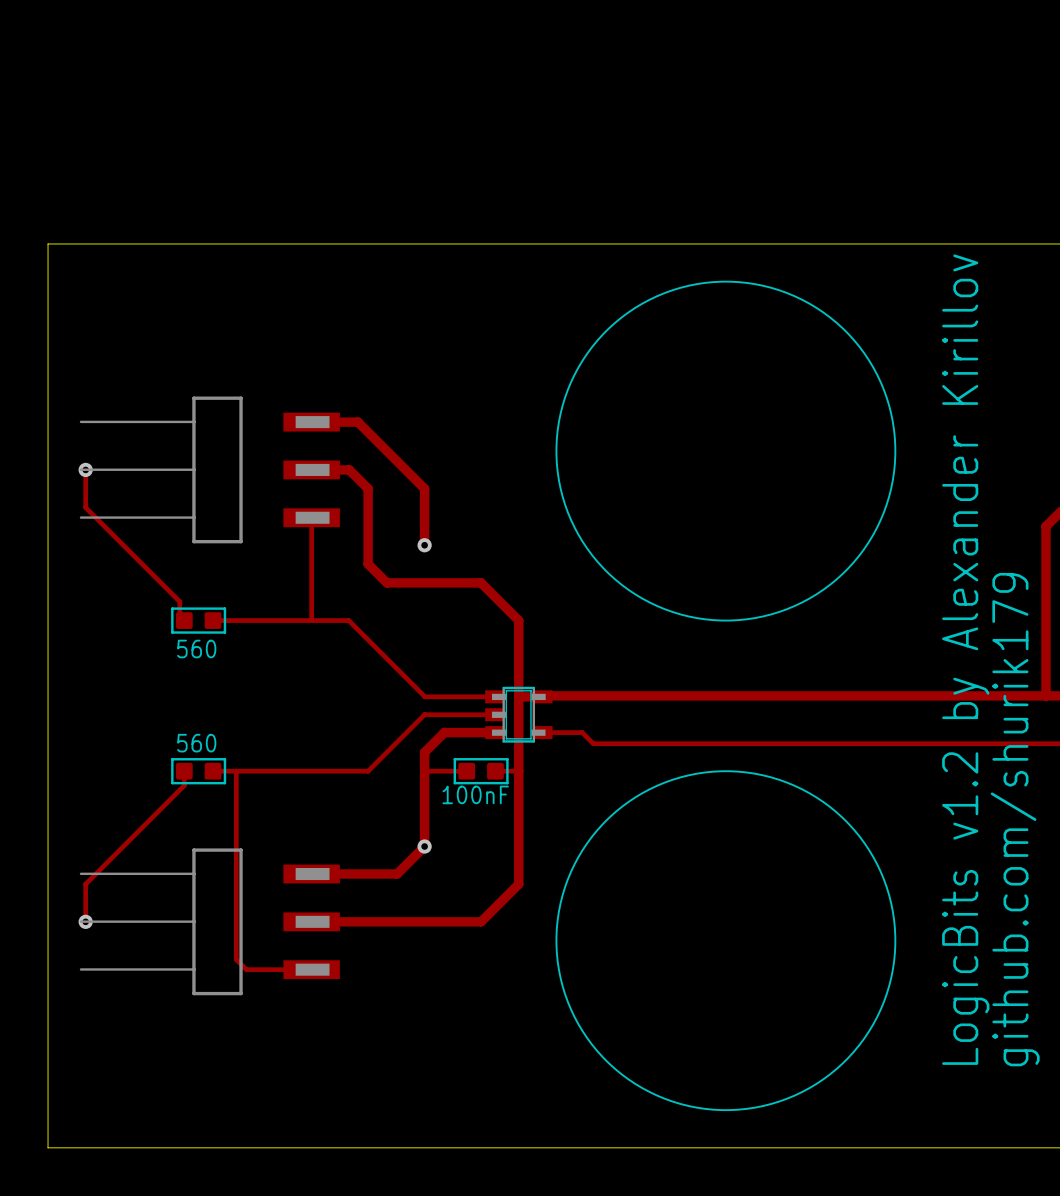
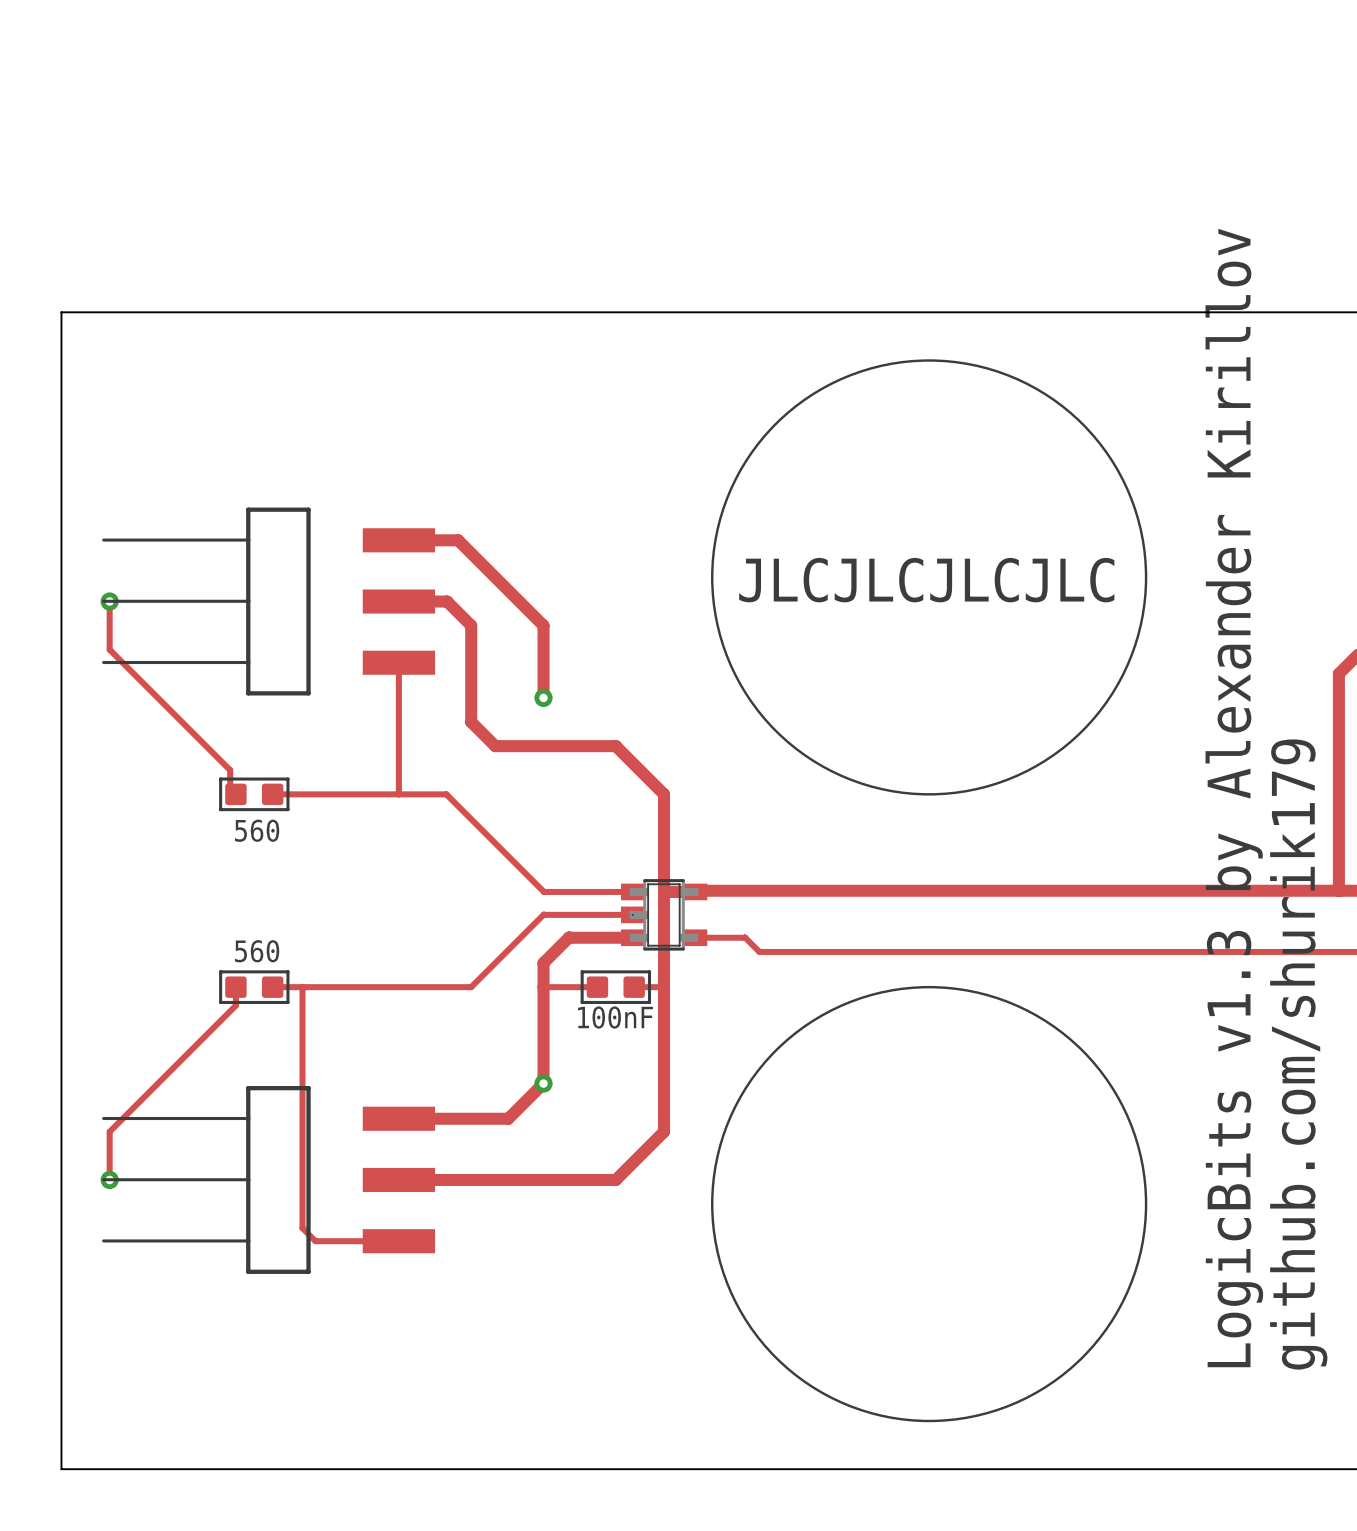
part footprint: [79, 396, 340, 544] -> [102, 507, 436, 696]
text: none -> JLCJLCJLCJLC (926, 580)
text: LogicBits v1.2 by Alexander Kirillov (965, 659) -> LogicBits v1.3 by Alexander Kirillov (1234, 798)
part footprint: [79, 848, 340, 996] -> [102, 1086, 436, 1274]

